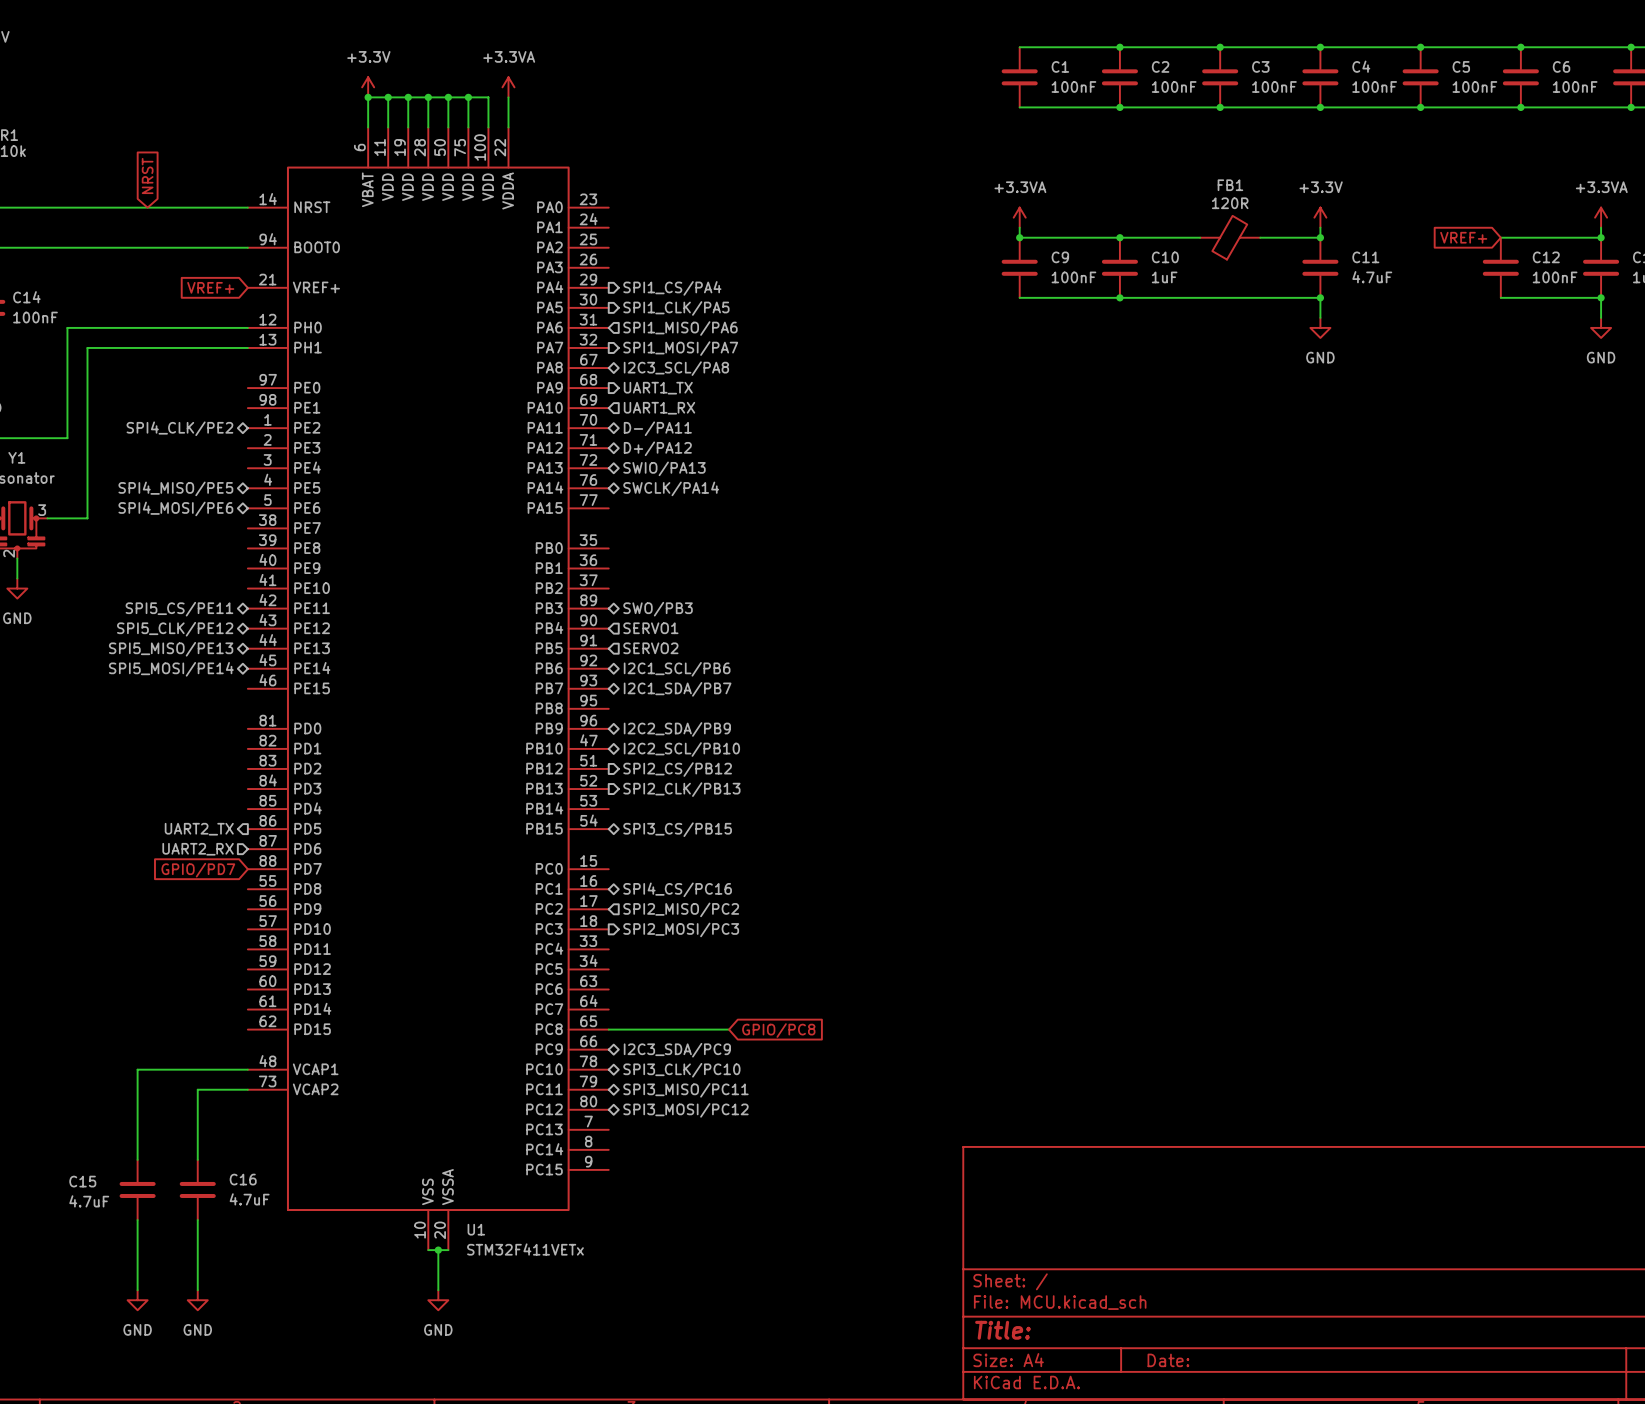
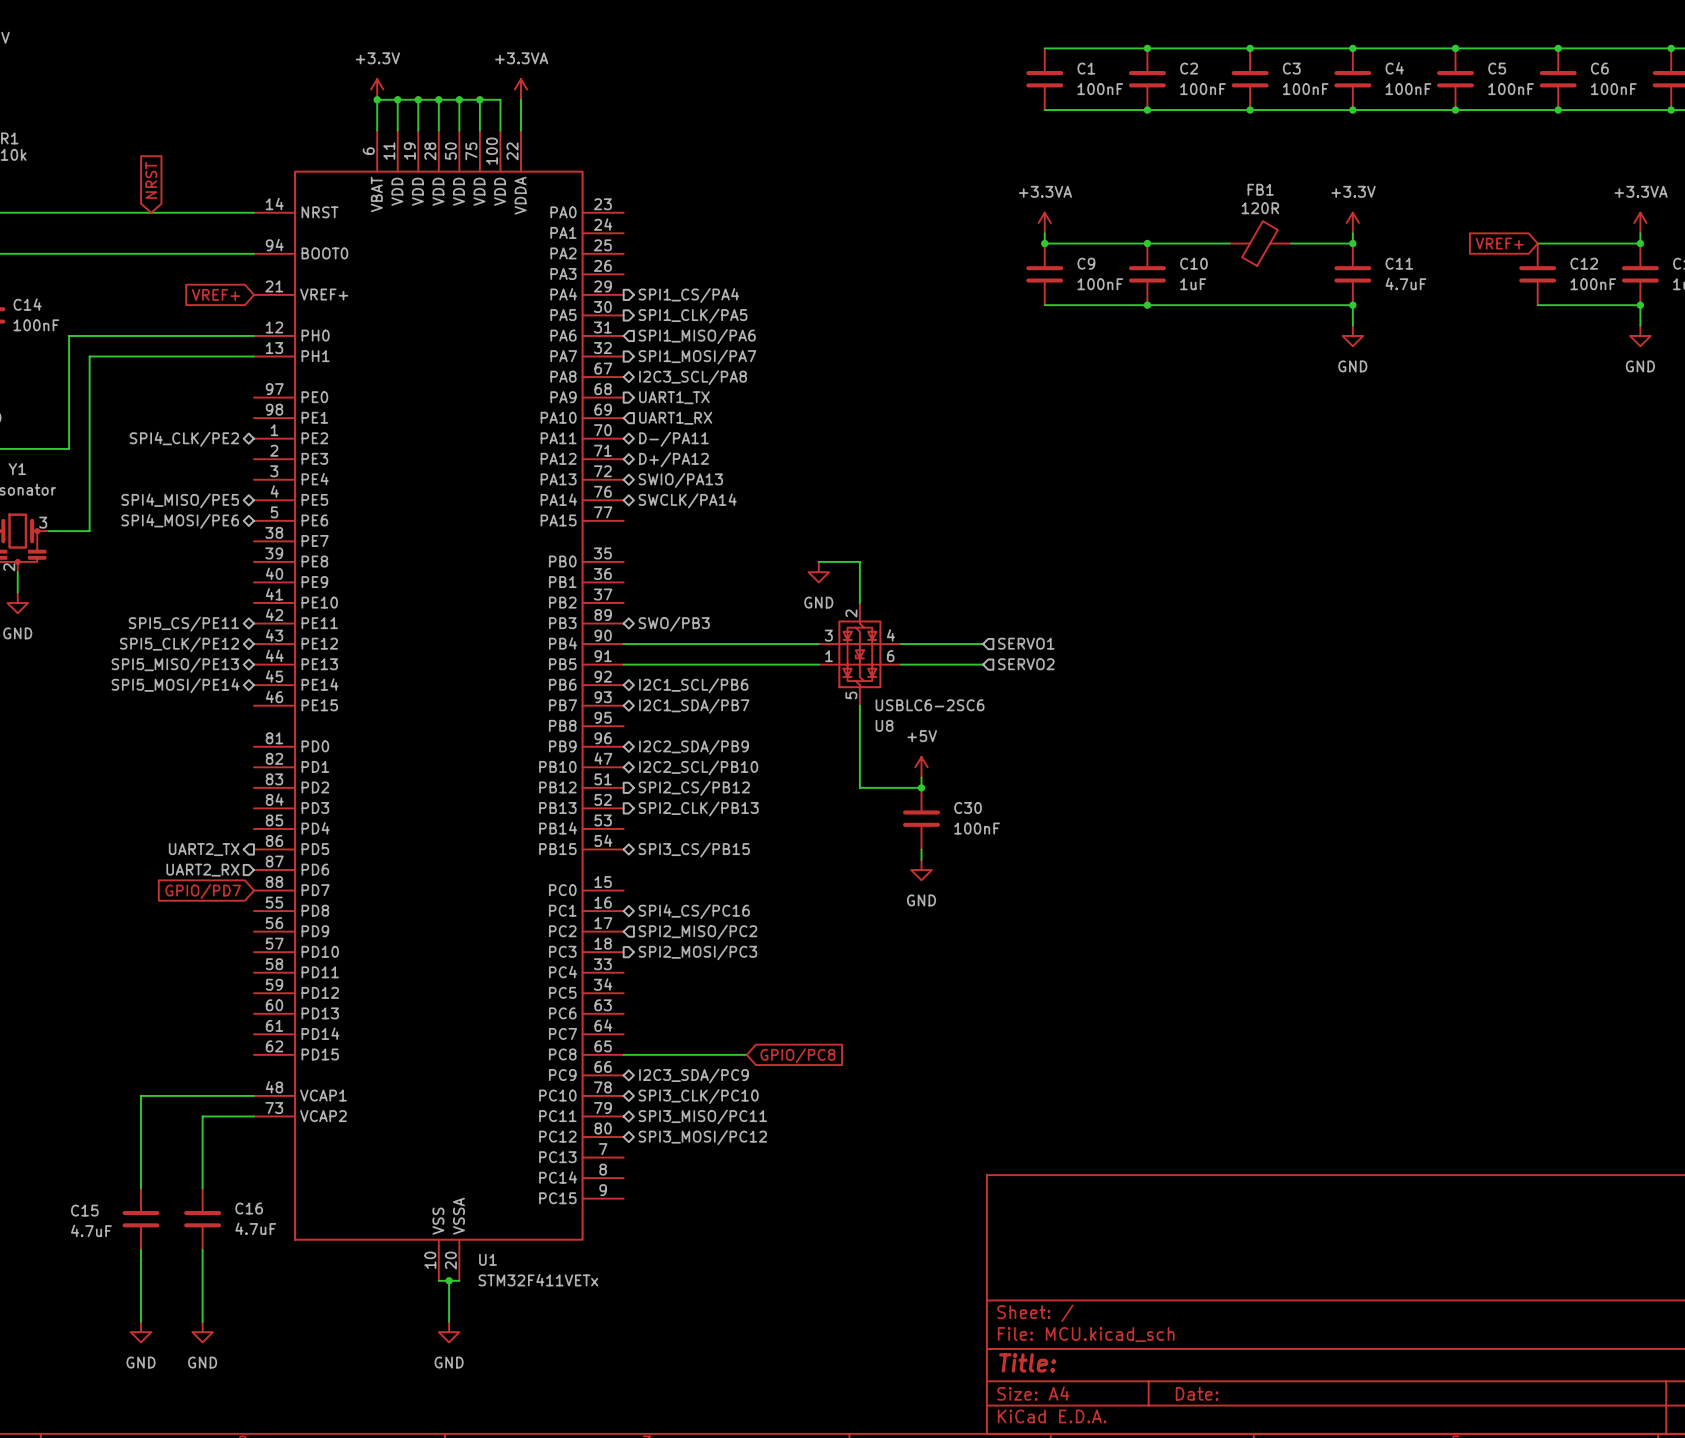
wire: none -> (818, 561) (859, 561) (859, 602)
power symbol: none -> GND (818, 572)
wire: none -> (623, 644) (818, 644)
hierarchical label: SERVO1 (650, 628) -> none
wire: none -> (900, 644) (983, 644)
hierarchical label: none -> SERVO1 (1026, 643)
U8: none -> USBLC6-2SC6 (859, 654)
wire: none -> (623, 664) (818, 664)
hierarchical label: SERVO2 (650, 648) -> none
wire: none -> (900, 664) (983, 664)
hierarchical label: none -> SERVO2 (1026, 664)
wire: none -> (859, 705) (859, 787) (921, 787) (921, 777)
power symbol: none -> +5V (921, 767)
junction: none -> (921, 787)
C30: none -> 100nF (921, 818)
wire: none -> (921, 849) (921, 859)
power symbol: none -> GND (921, 870)

